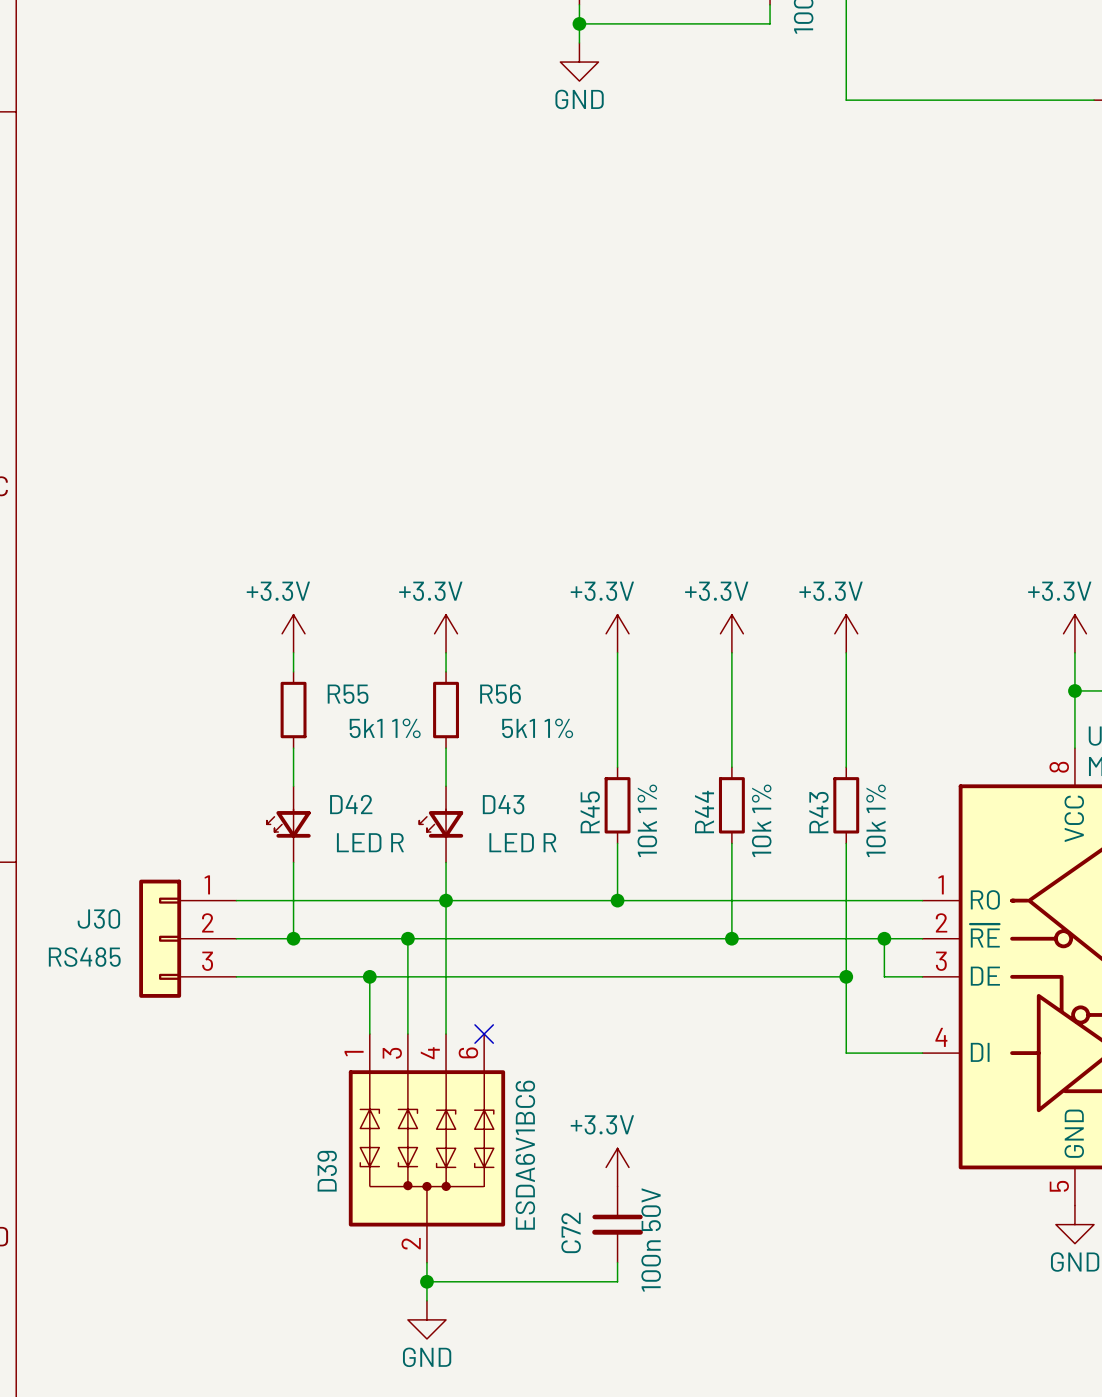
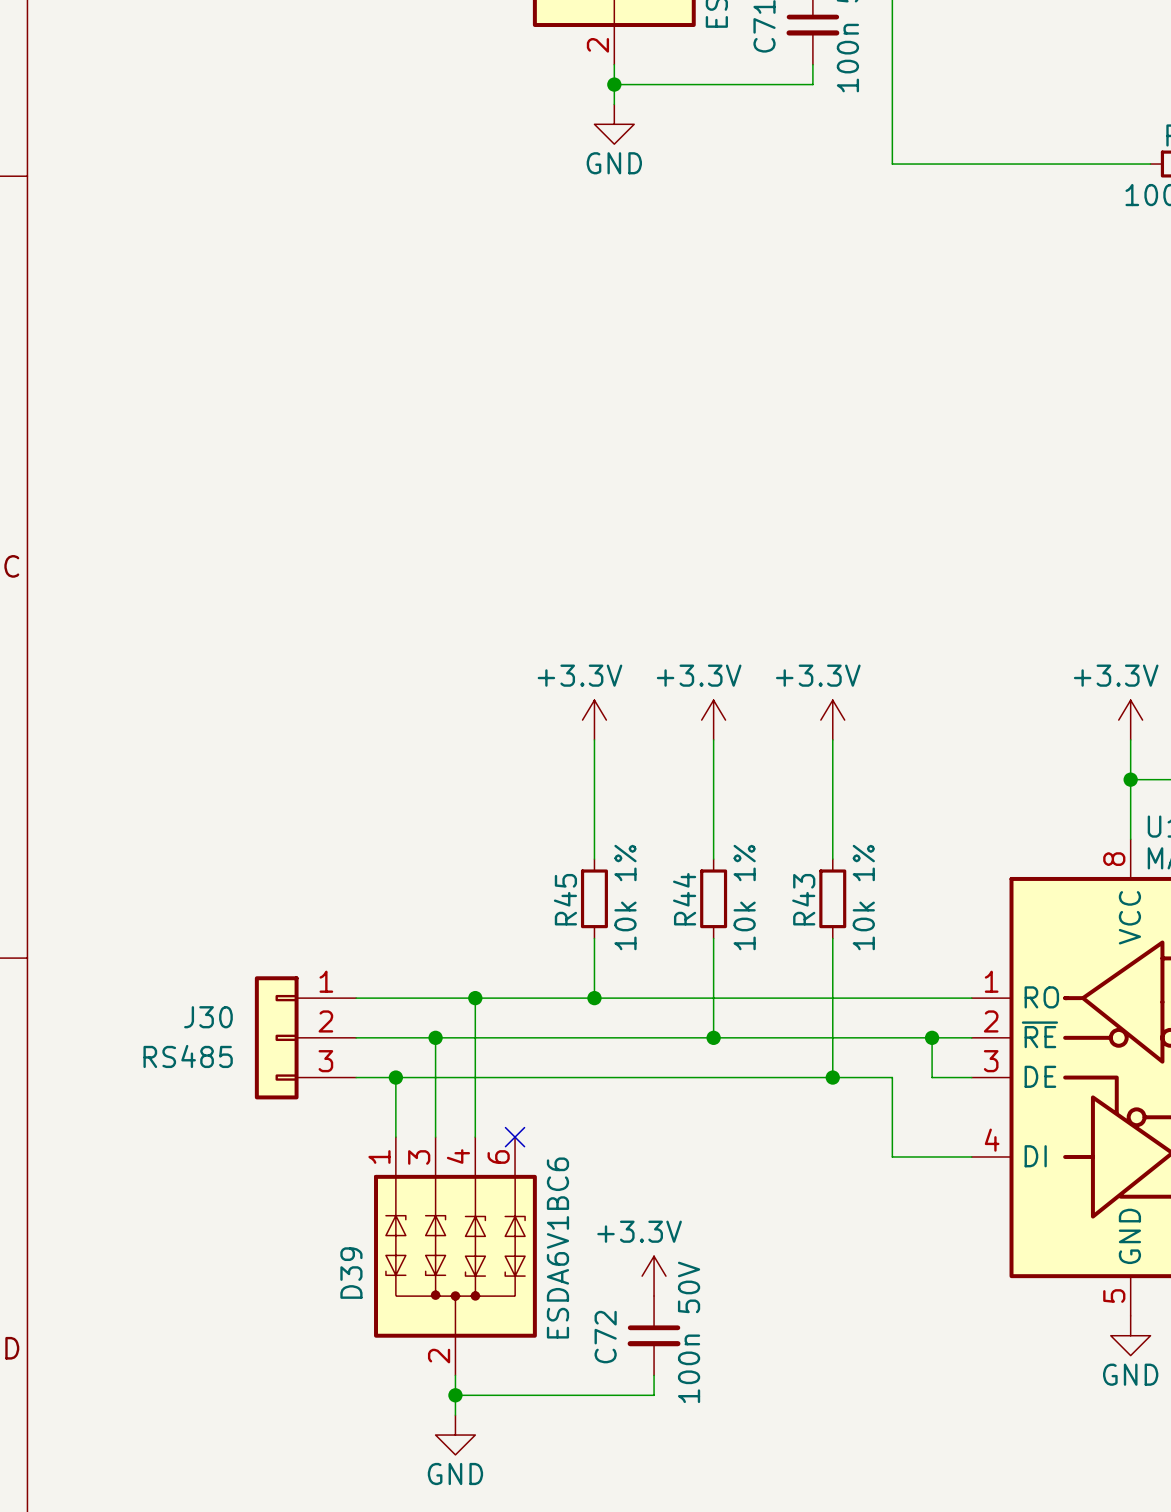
power symbol: +3.3V (293, 633) -> none
power symbol: +3.3V (446, 633) -> none
power symbol: none -> +3.3V (594, 720)
power symbol: +3.3V (617, 633) -> none
power symbol: none -> +3.3V (713, 720)
power symbol: +3.3V (731, 633) -> none
power symbol: none -> +3.3V (832, 720)
power symbol: +3.3V (846, 633) -> none
wire: (293, 652) (293, 671) -> none
wire: (446, 652) (446, 671) -> none
wire: (617, 652) (617, 767) -> (594, 739) (594, 859)
wire: (731, 652) (731, 767) -> (713, 739) (713, 859)
wire: (846, 652) (846, 767) -> (832, 739) (832, 859)
R55: 5k1 1% (293, 710) -> none
R56: 5k1 1% (446, 710) -> none
wire: (293, 748) (293, 786) -> none
wire: (446, 748) (446, 786) -> none
R45 position: (617, 805) -> (594, 898)
R44 position: (731, 805) -> (713, 898)
R43 position: (846, 805) -> (832, 898)
D42: LED R (288, 824) -> none
D43: LED R (441, 824) -> none
wire: (617, 843) (617, 900) -> (594, 938) (594, 998)
wire: (731, 843) (731, 938) -> (713, 938) (713, 1037)
wire: (846, 843) (846, 976) -> (832, 938) (832, 1077)
wire: (293, 862) (293, 938) -> none
wire: (446, 862) (446, 900) -> none
junction: none -> (594, 998)
junction: (617, 900) -> none
J30 position: (187, 938) -> (305, 1037)
junction: (293, 938) -> none
junction: none -> (713, 1037)
junction: (731, 938) -> none
junction: none -> (832, 1077)
junction: (846, 976) -> none

